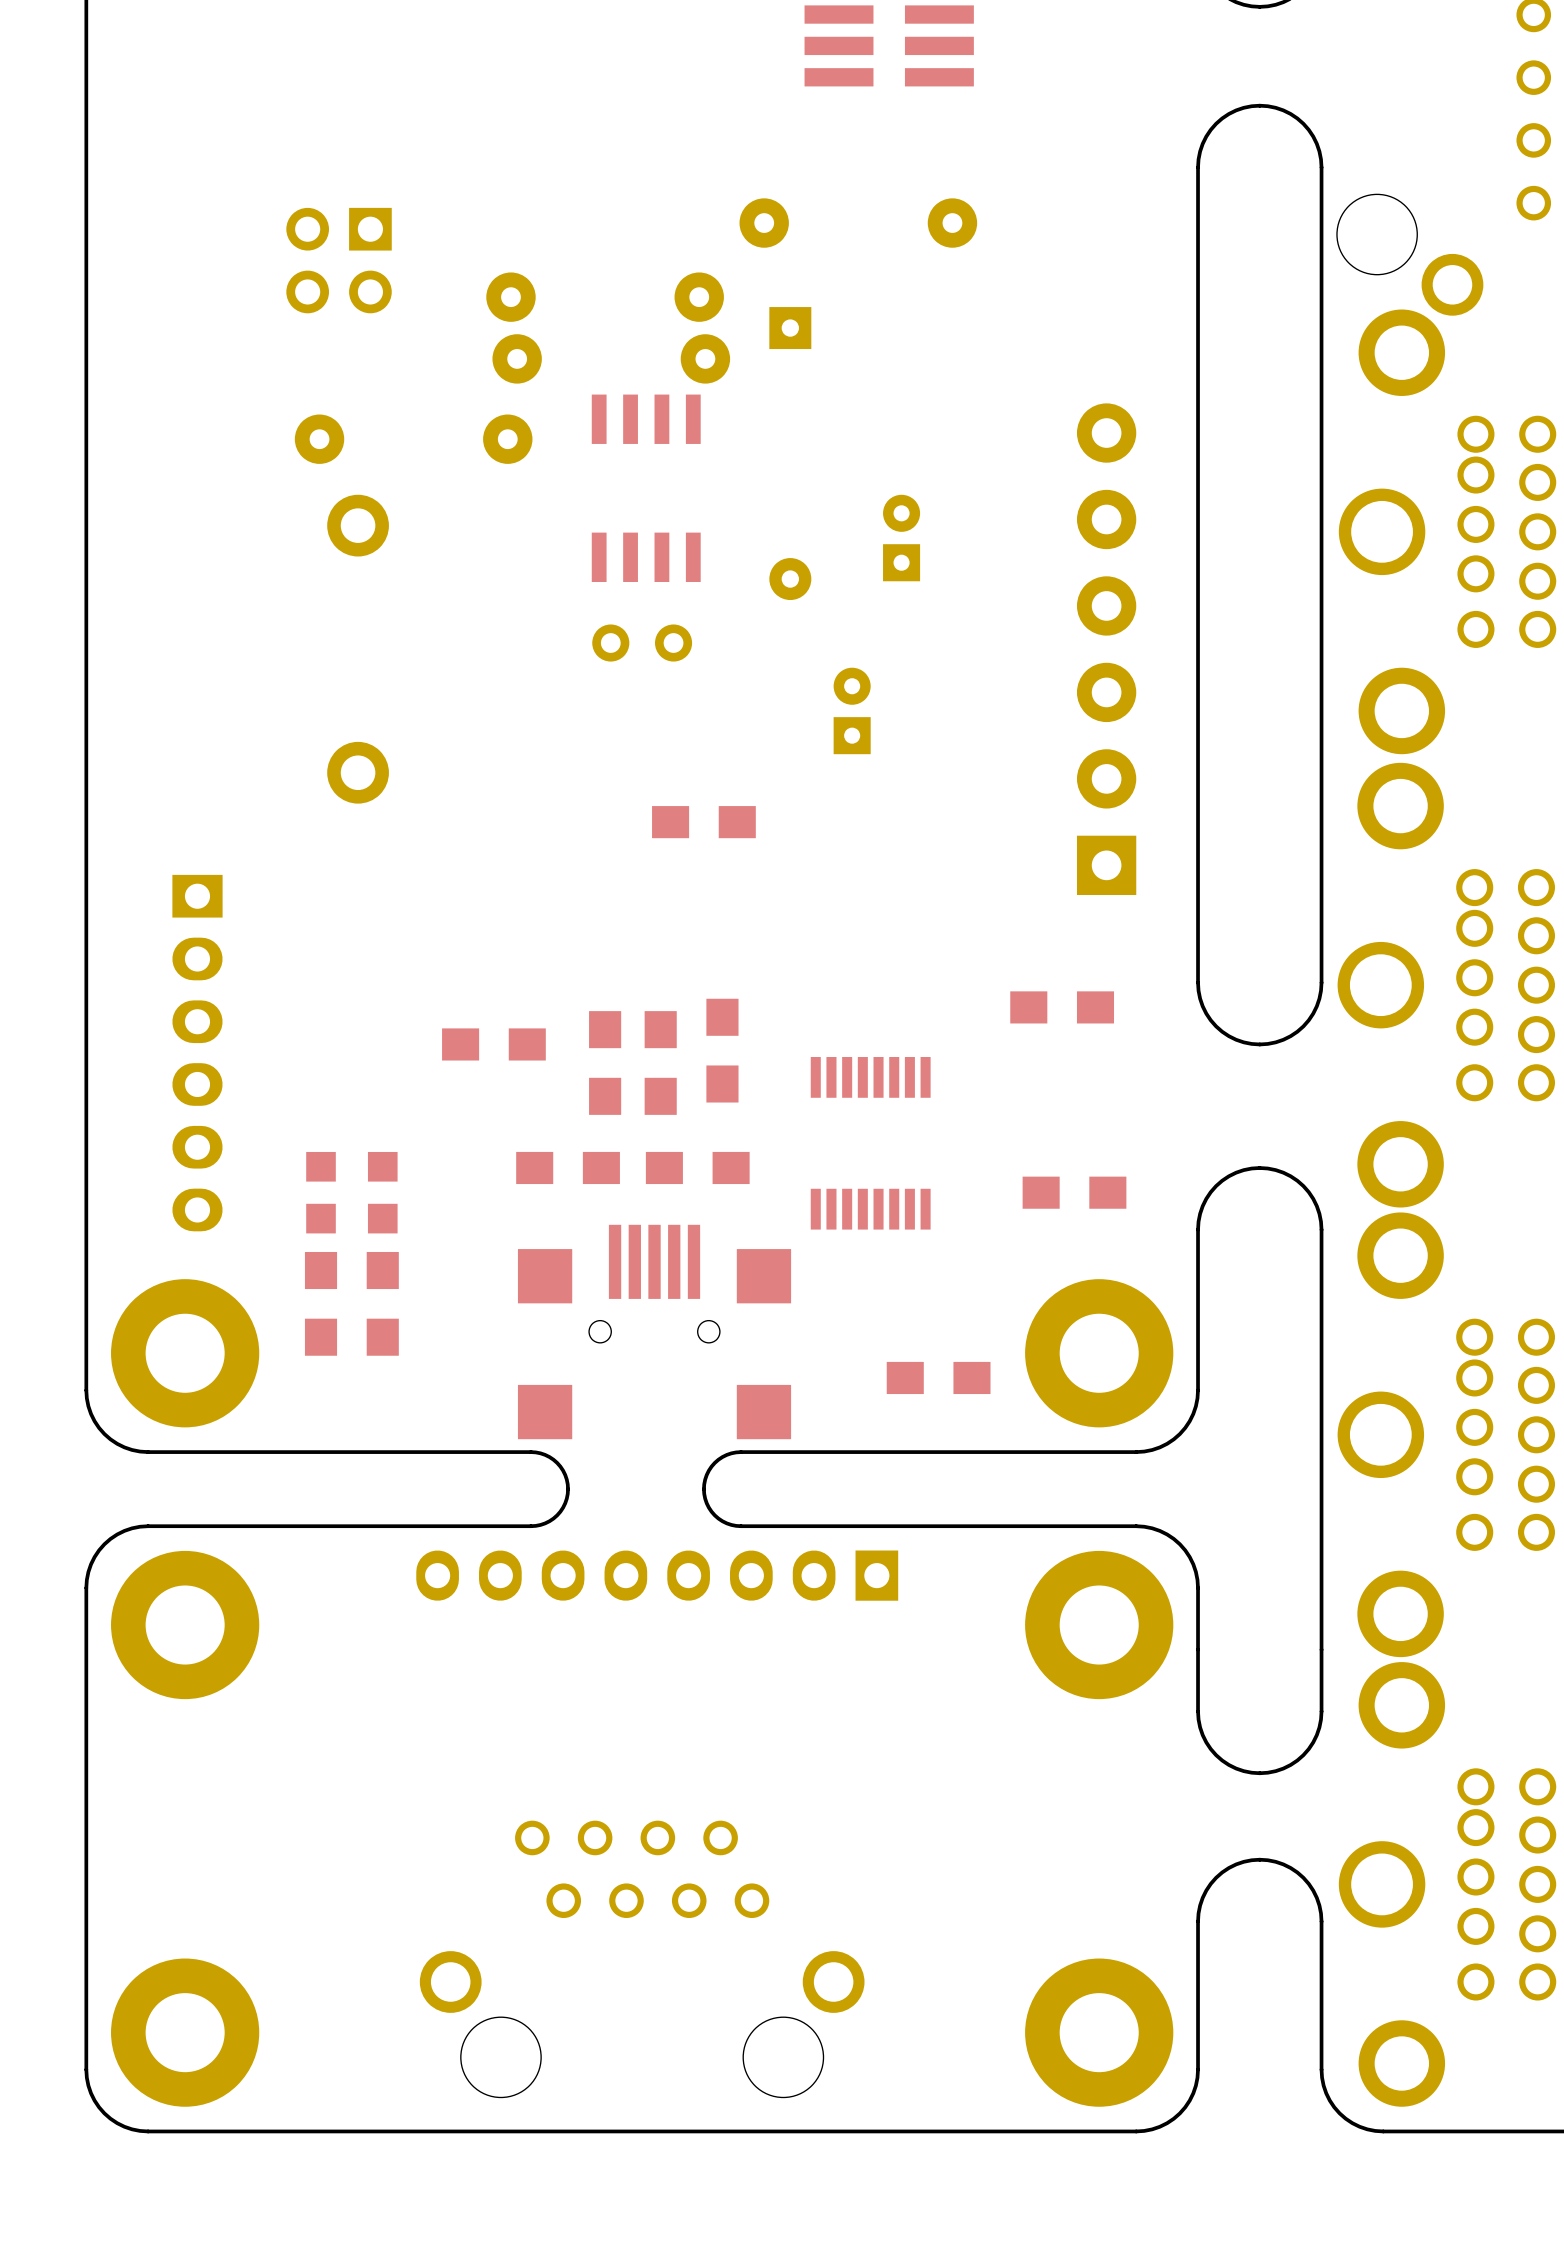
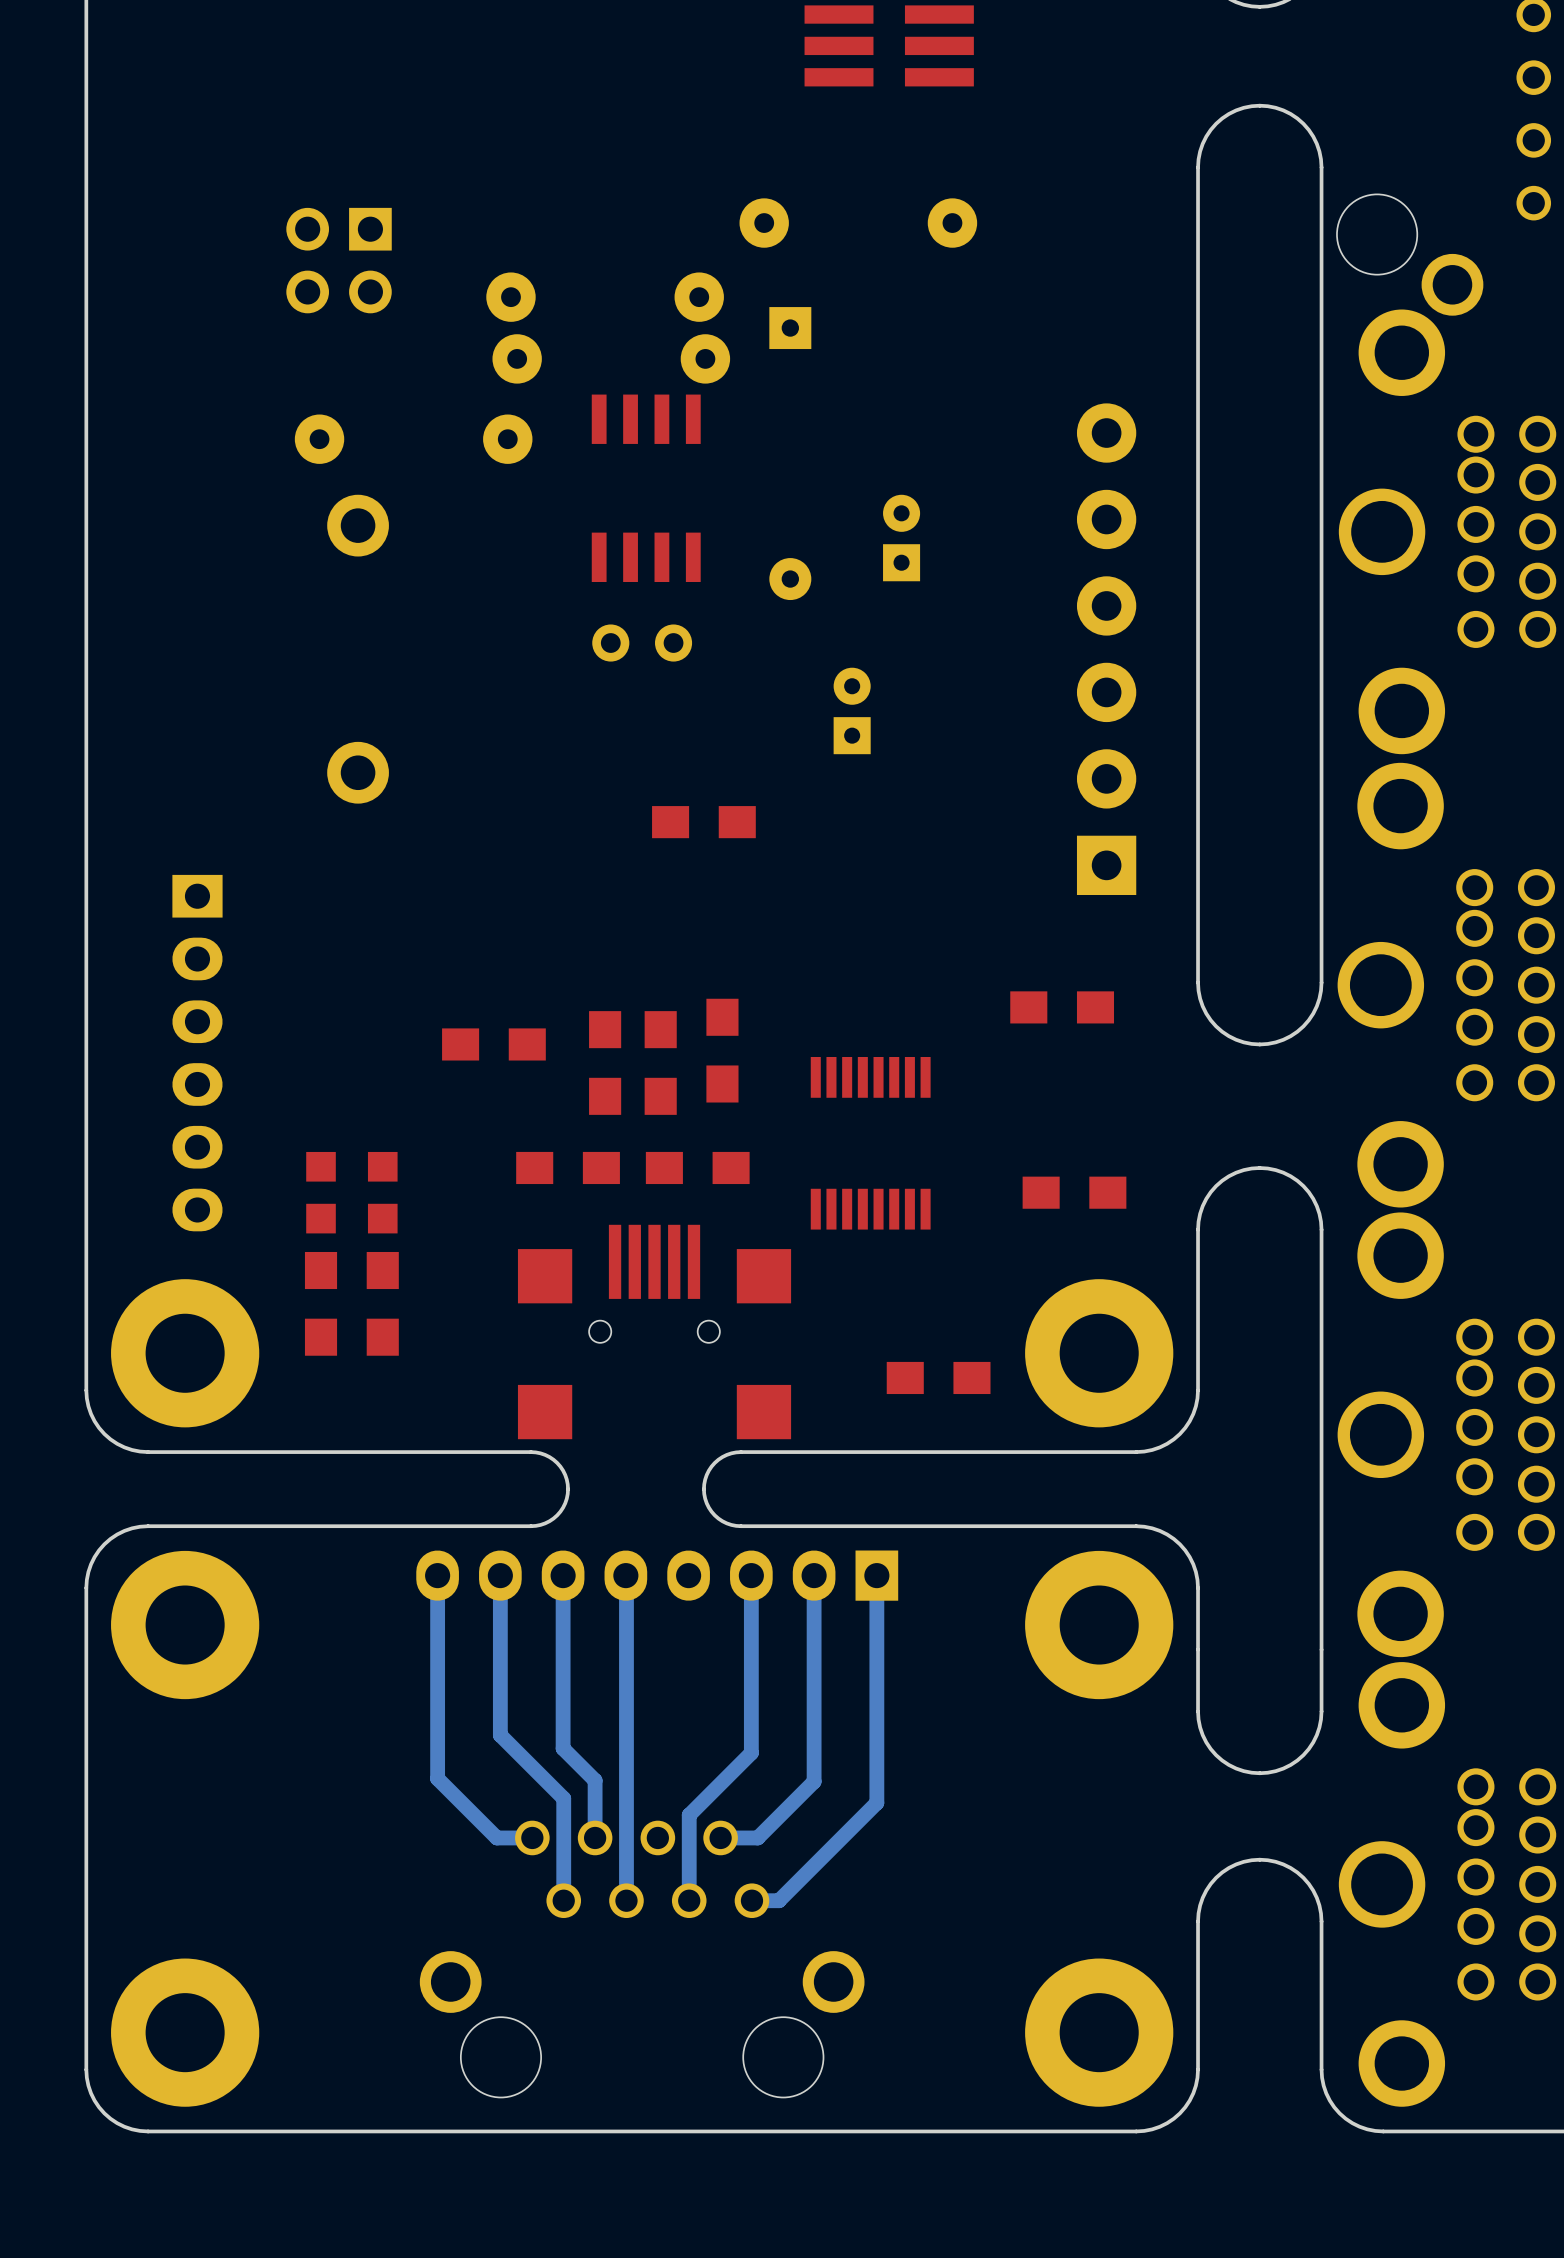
bottom track: none -> (437, 1575) (437, 1778) (496, 1837) (532, 1837)
bottom track: none -> (500, 1575) (500, 1735) (563, 1798) (563, 1900)
bottom track: none -> (563, 1575) (563, 1748) (595, 1780) (595, 1837)
bottom track: none -> (625, 1575) (626, 1900)
bottom track: none -> (751, 1575) (751, 1752) (689, 1815) (689, 1900)
bottom track: none -> (814, 1575) (814, 1781) (757, 1837) (720, 1837)
bottom track: none -> (876, 1575) (876, 1802) (779, 1900) (751, 1900)

